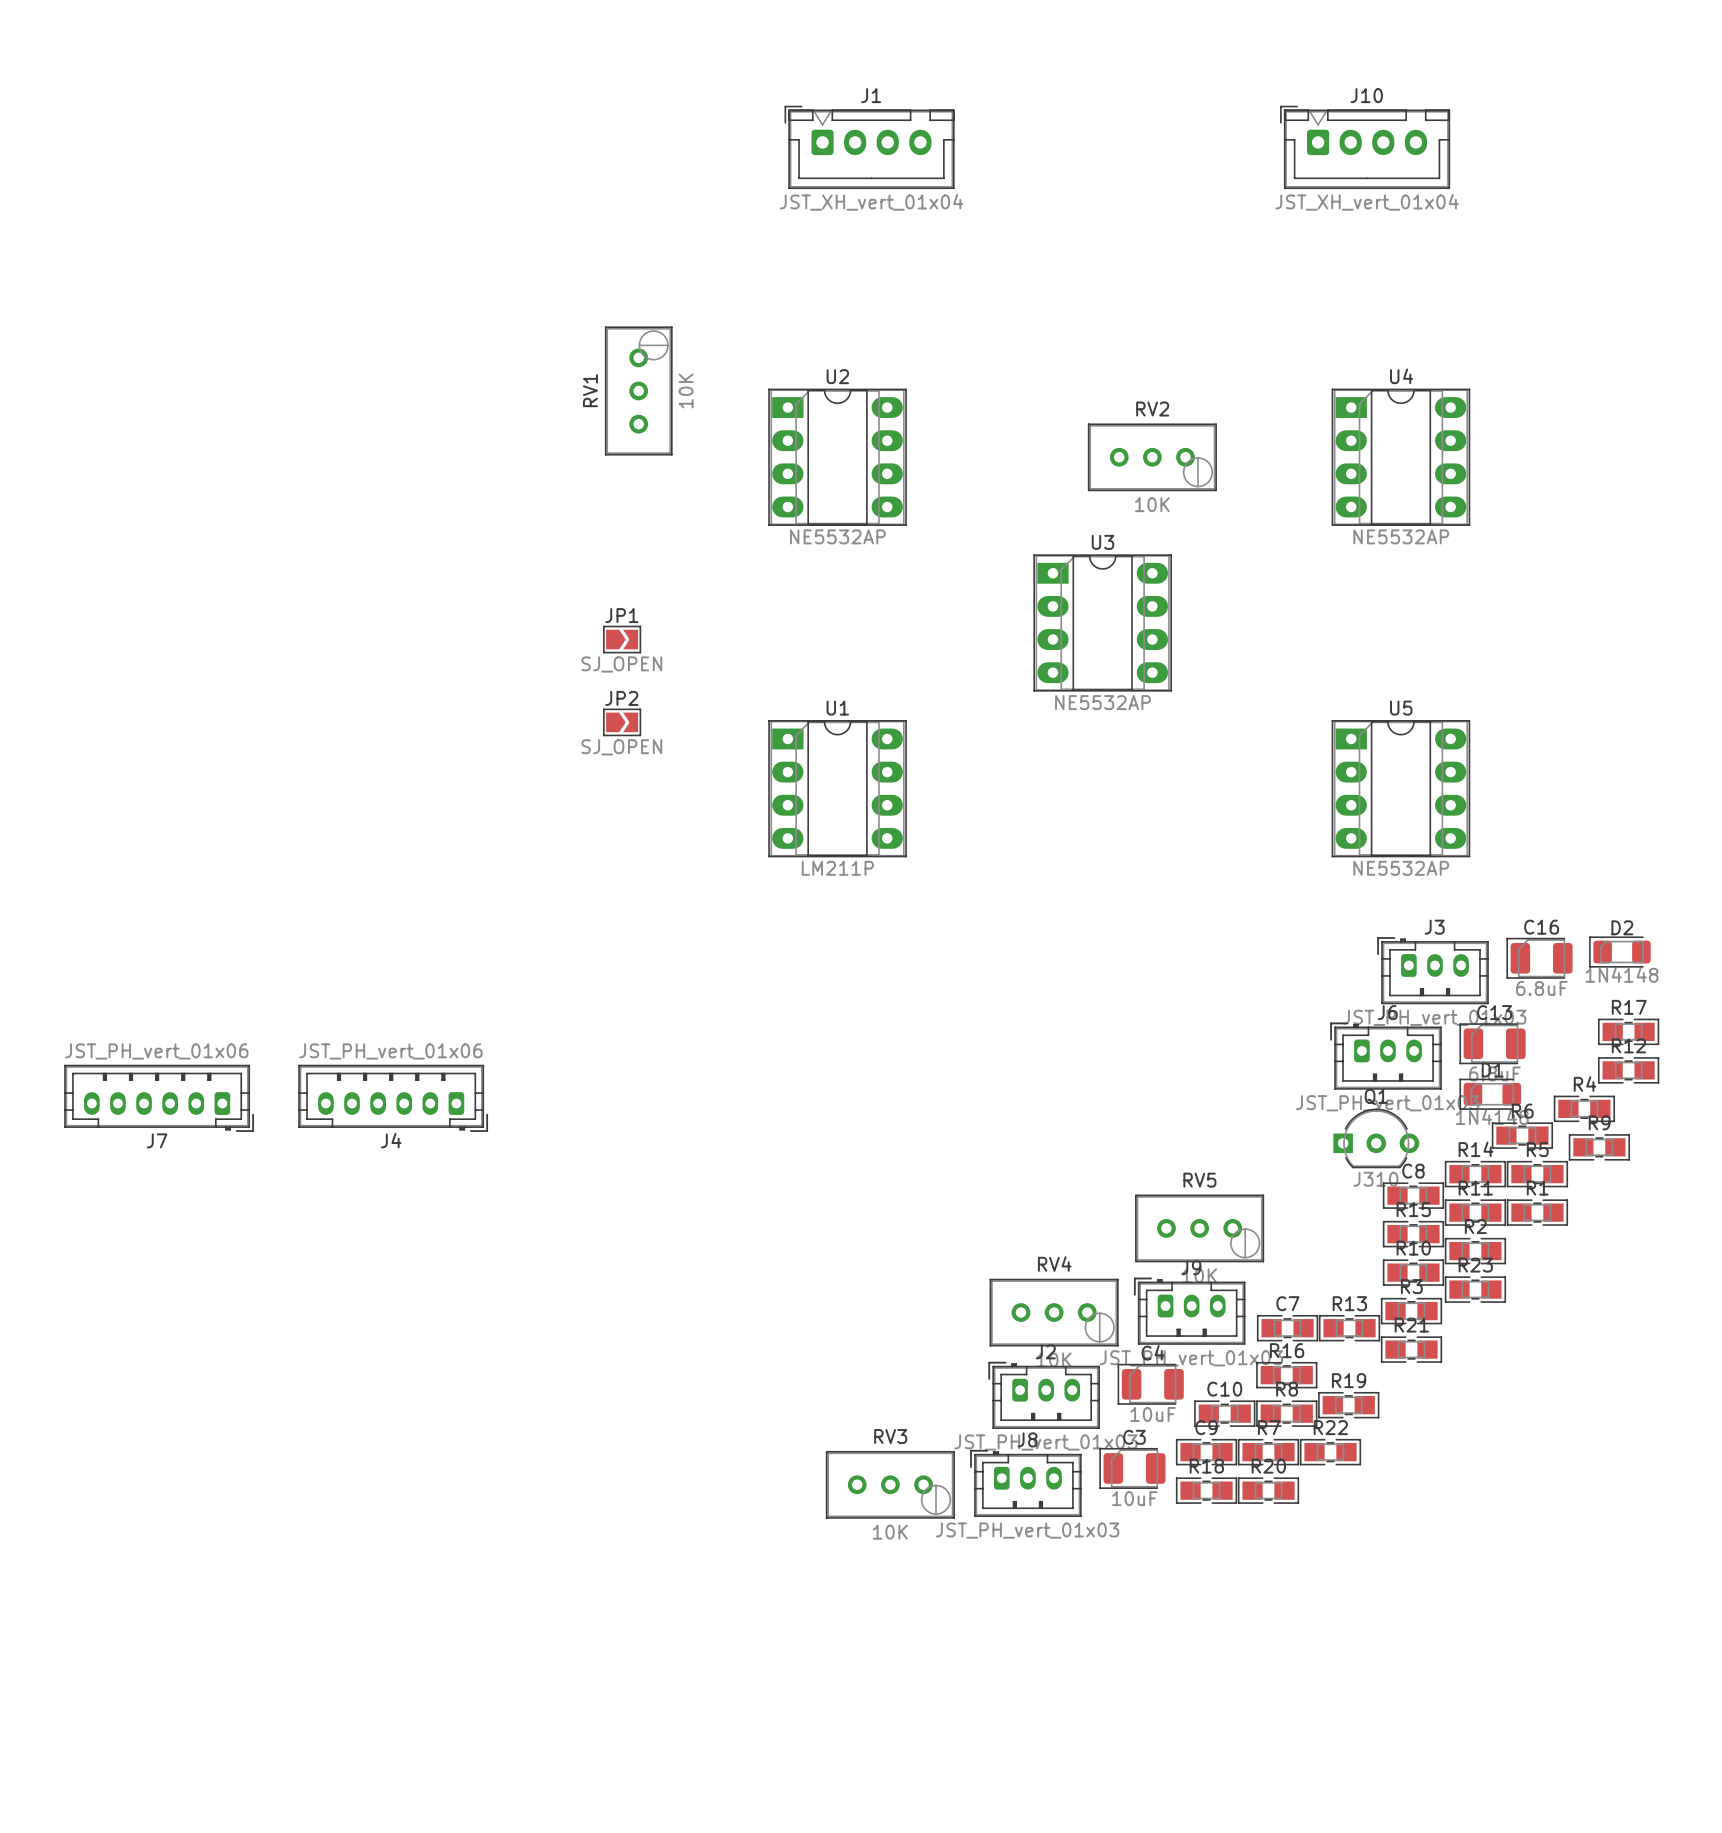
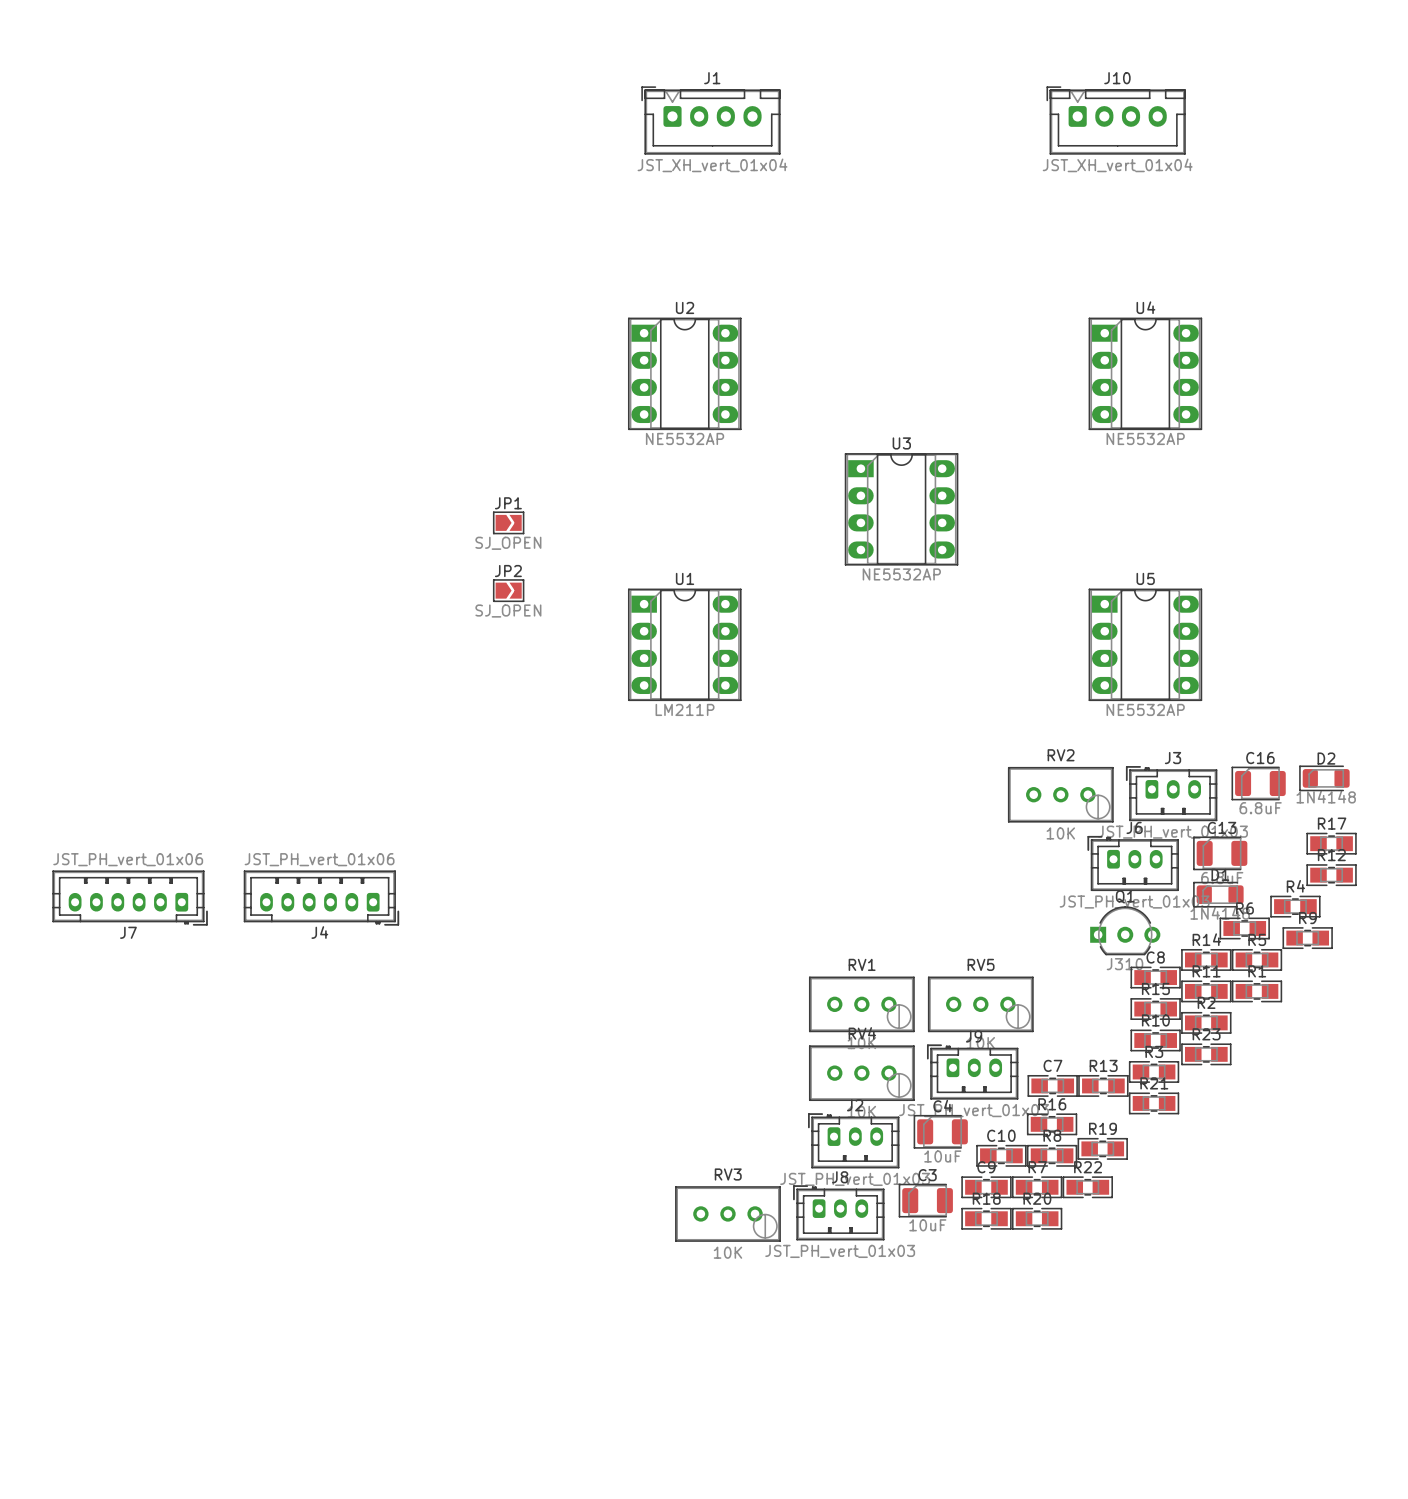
RV1 rotation: 0° (638, 390) -> 90° clockwise (861, 1004)
RV1 position: (638, 390) -> (861, 1004)
RV2 position: (1152, 457) -> (1060, 794)

